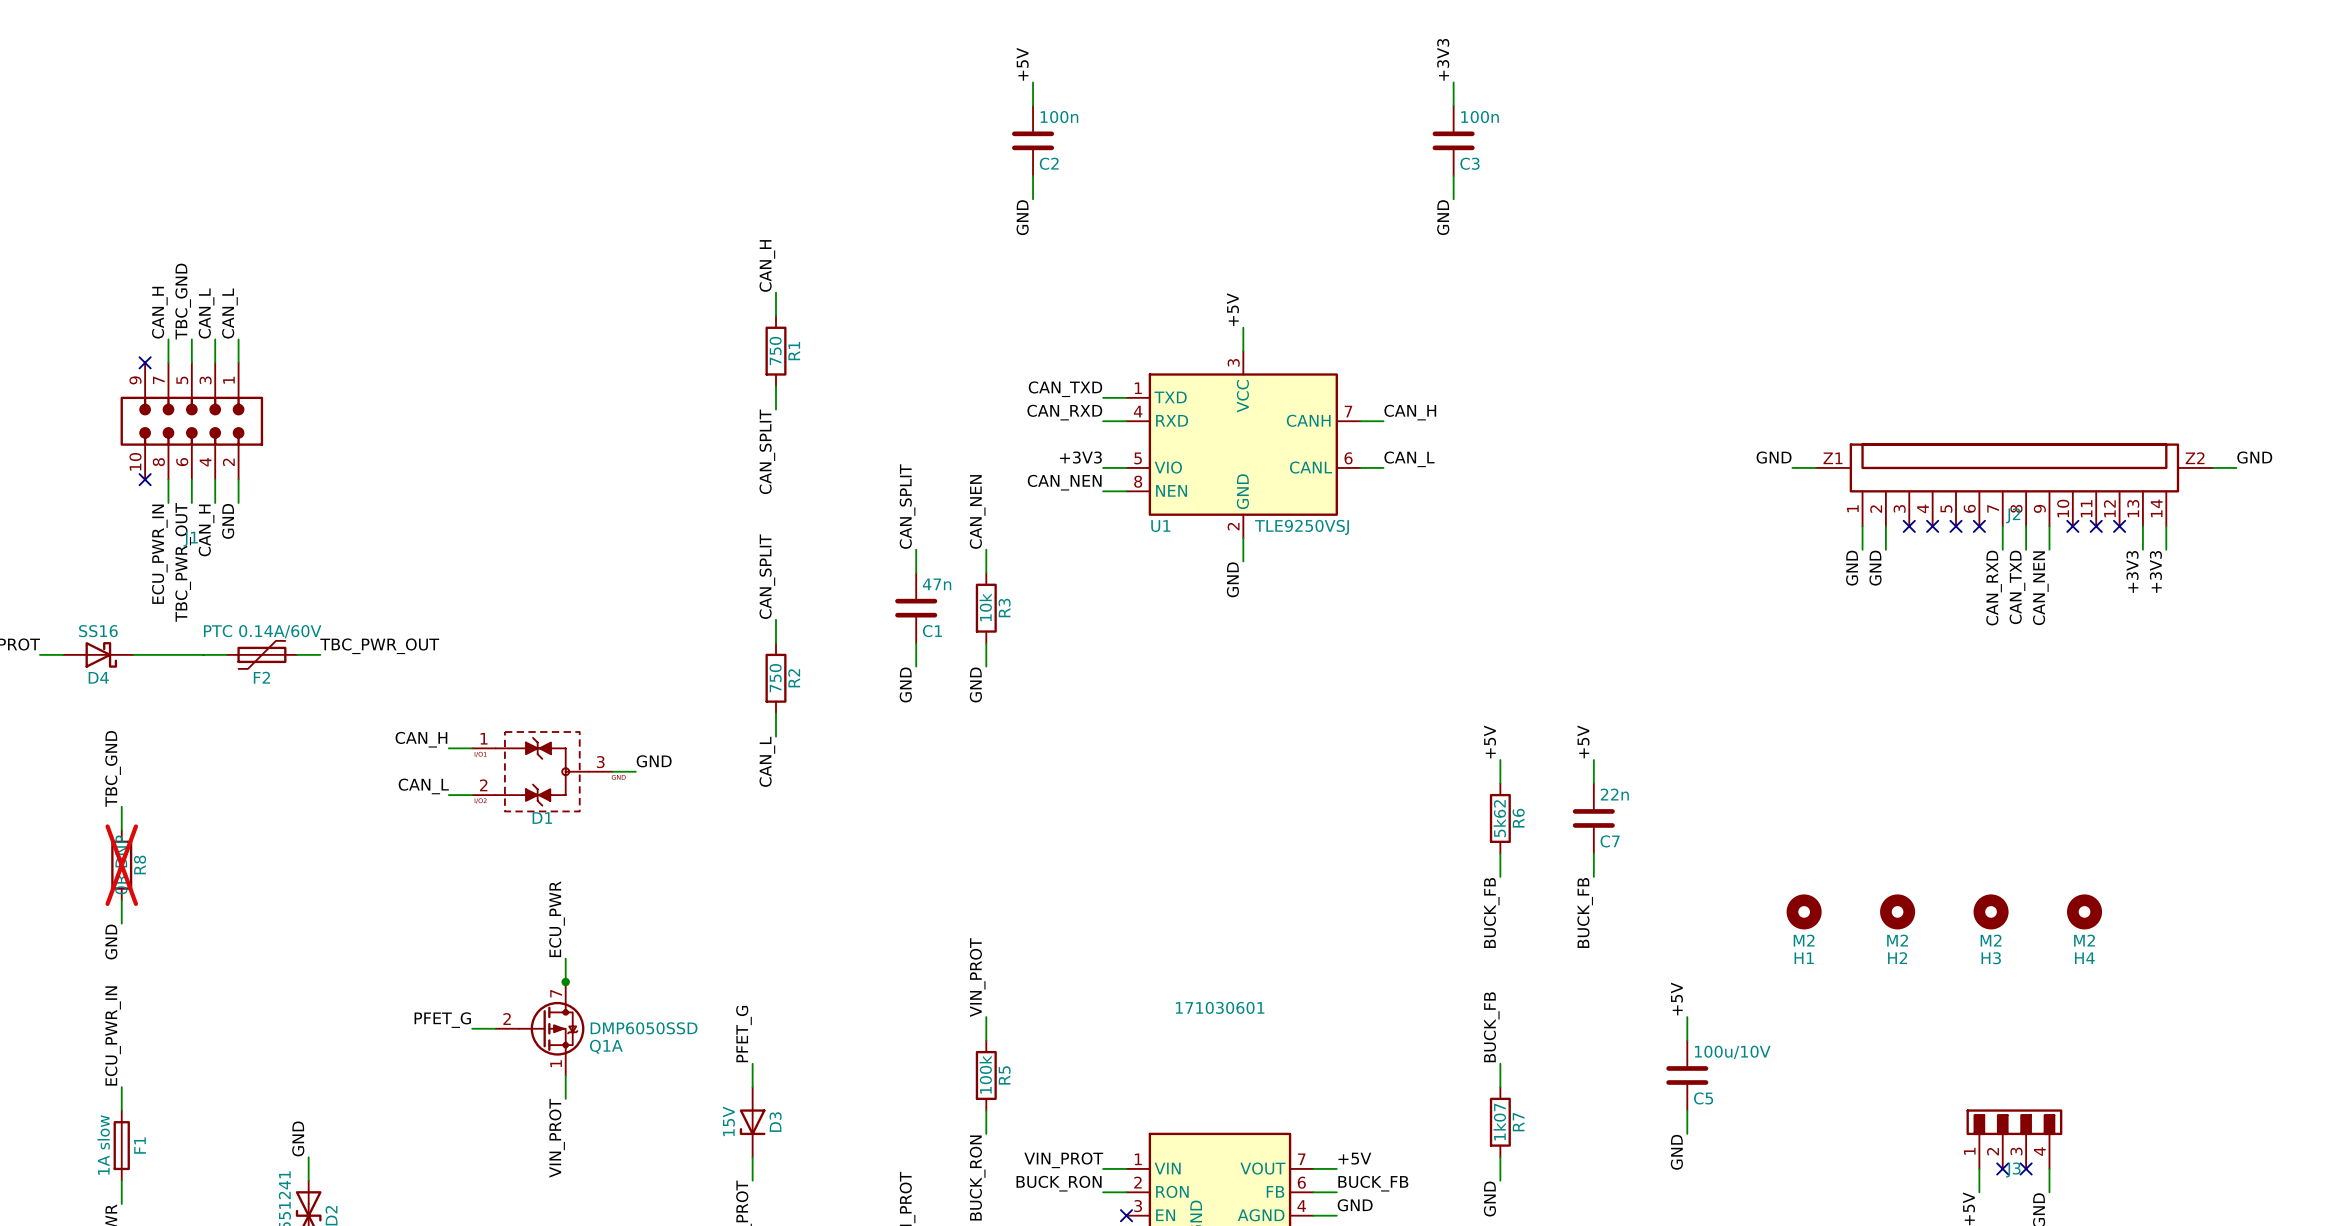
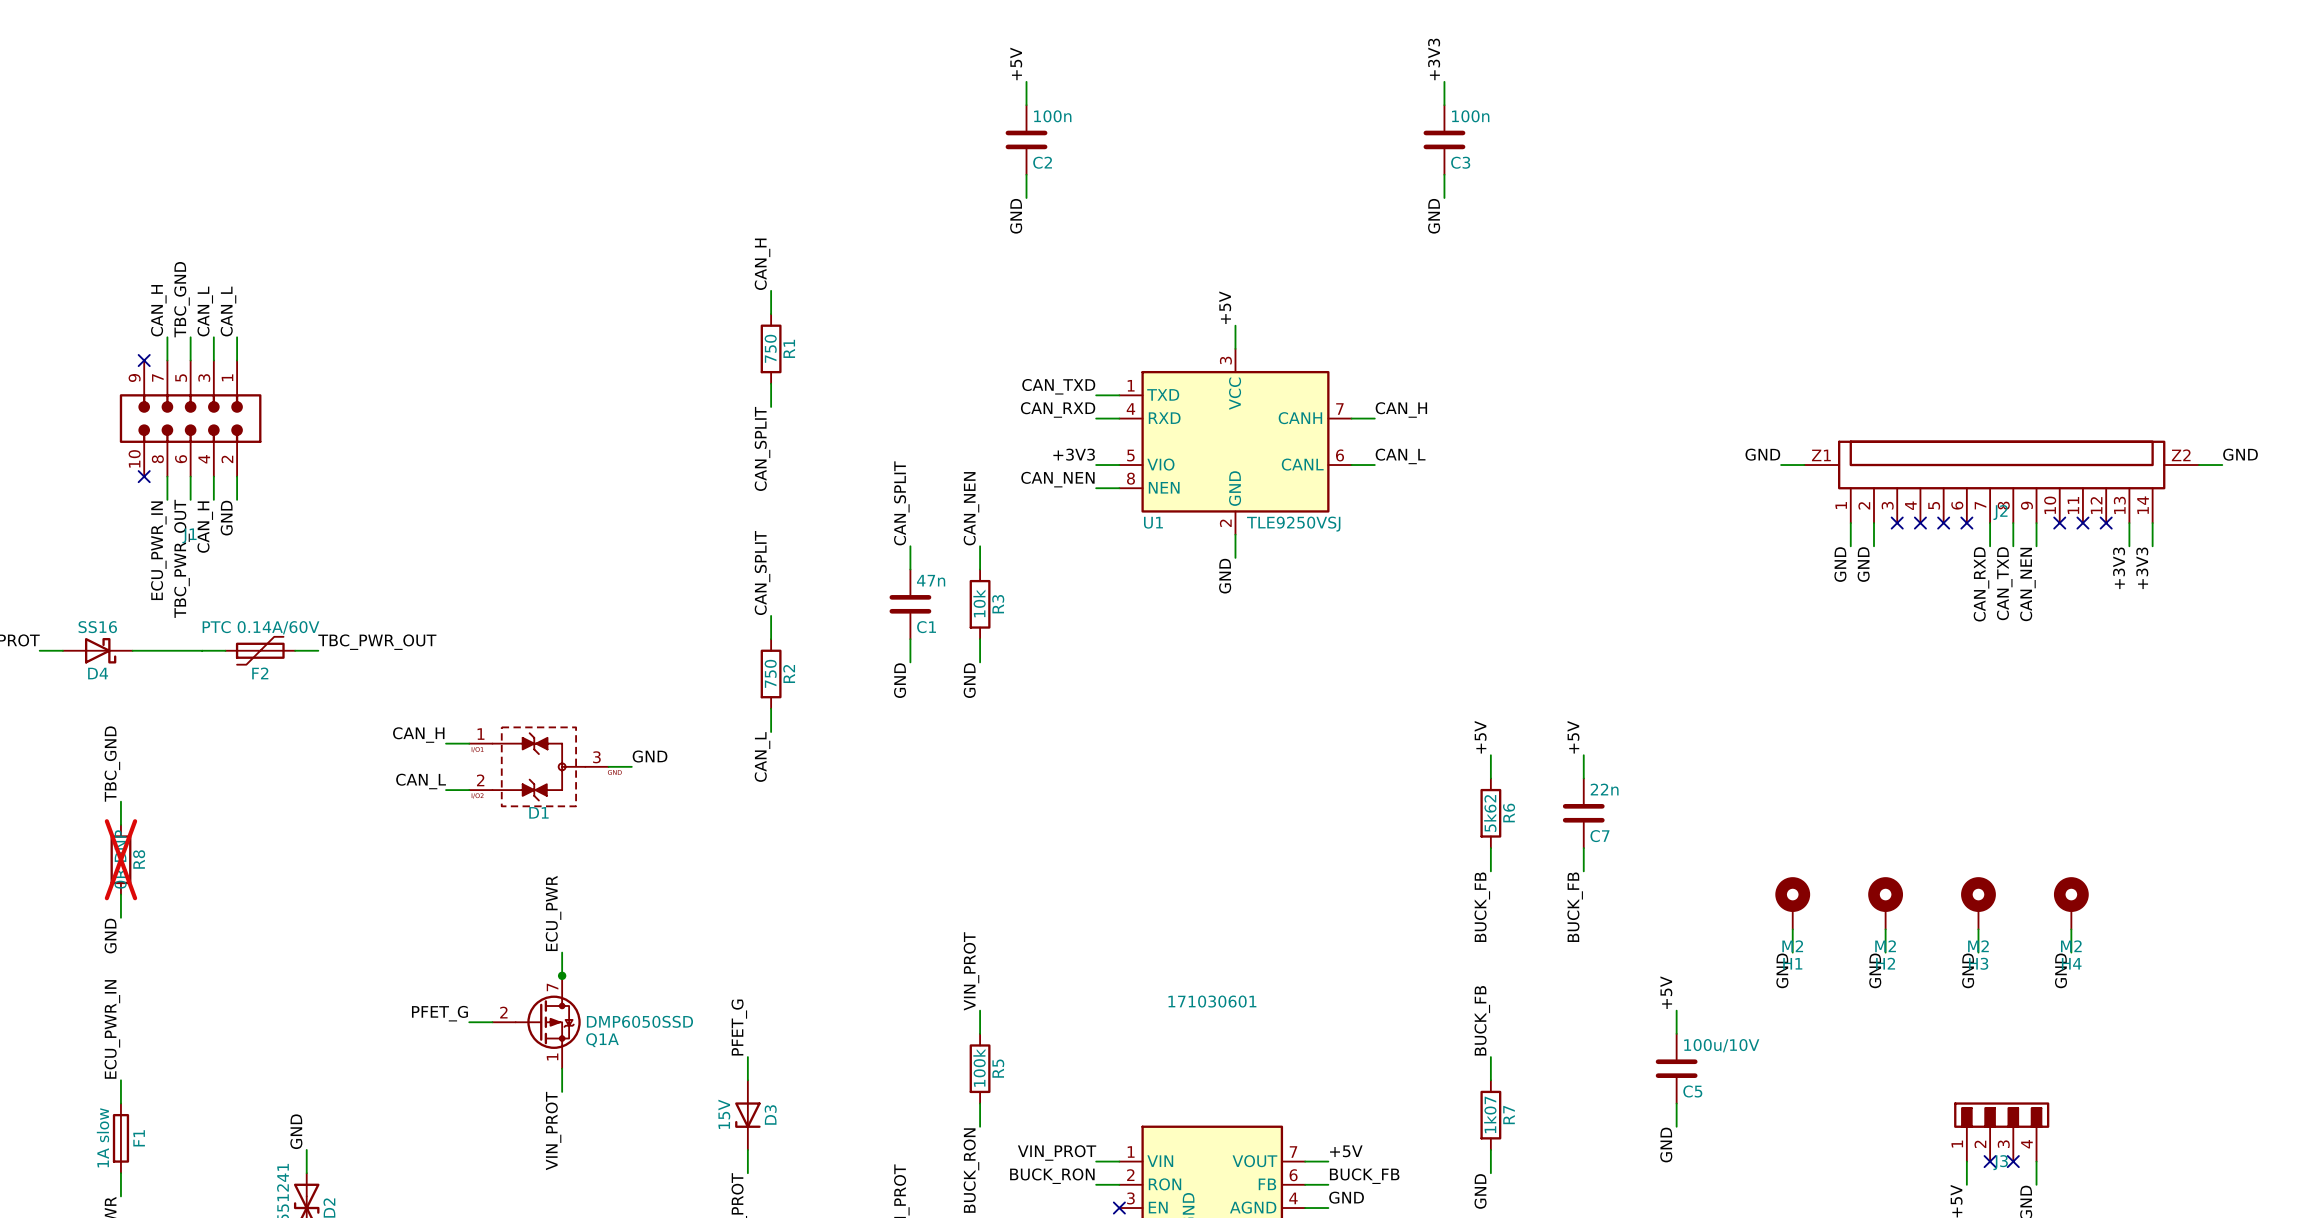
H1 symbol: [1786, 894, 1822, 930] -> [1775, 877, 1811, 930]
H2 symbol: [1880, 894, 1916, 930] -> [1868, 877, 1904, 930]
H3 symbol: [1973, 894, 2009, 930] -> [1961, 877, 1996, 930]
H4 symbol: [2067, 894, 2103, 930] -> [2053, 877, 2089, 930]
wire: none -> (1792, 929) (1792, 952)
wire: none -> (1885, 929) (1885, 952)
wire: none -> (1978, 929) (1978, 952)
wire: none -> (2071, 929) (2071, 952)
label: none -> GND (1782, 970)
label: none -> GND (1875, 970)
label: none -> GND (1968, 970)
label: none -> GND (2061, 970)

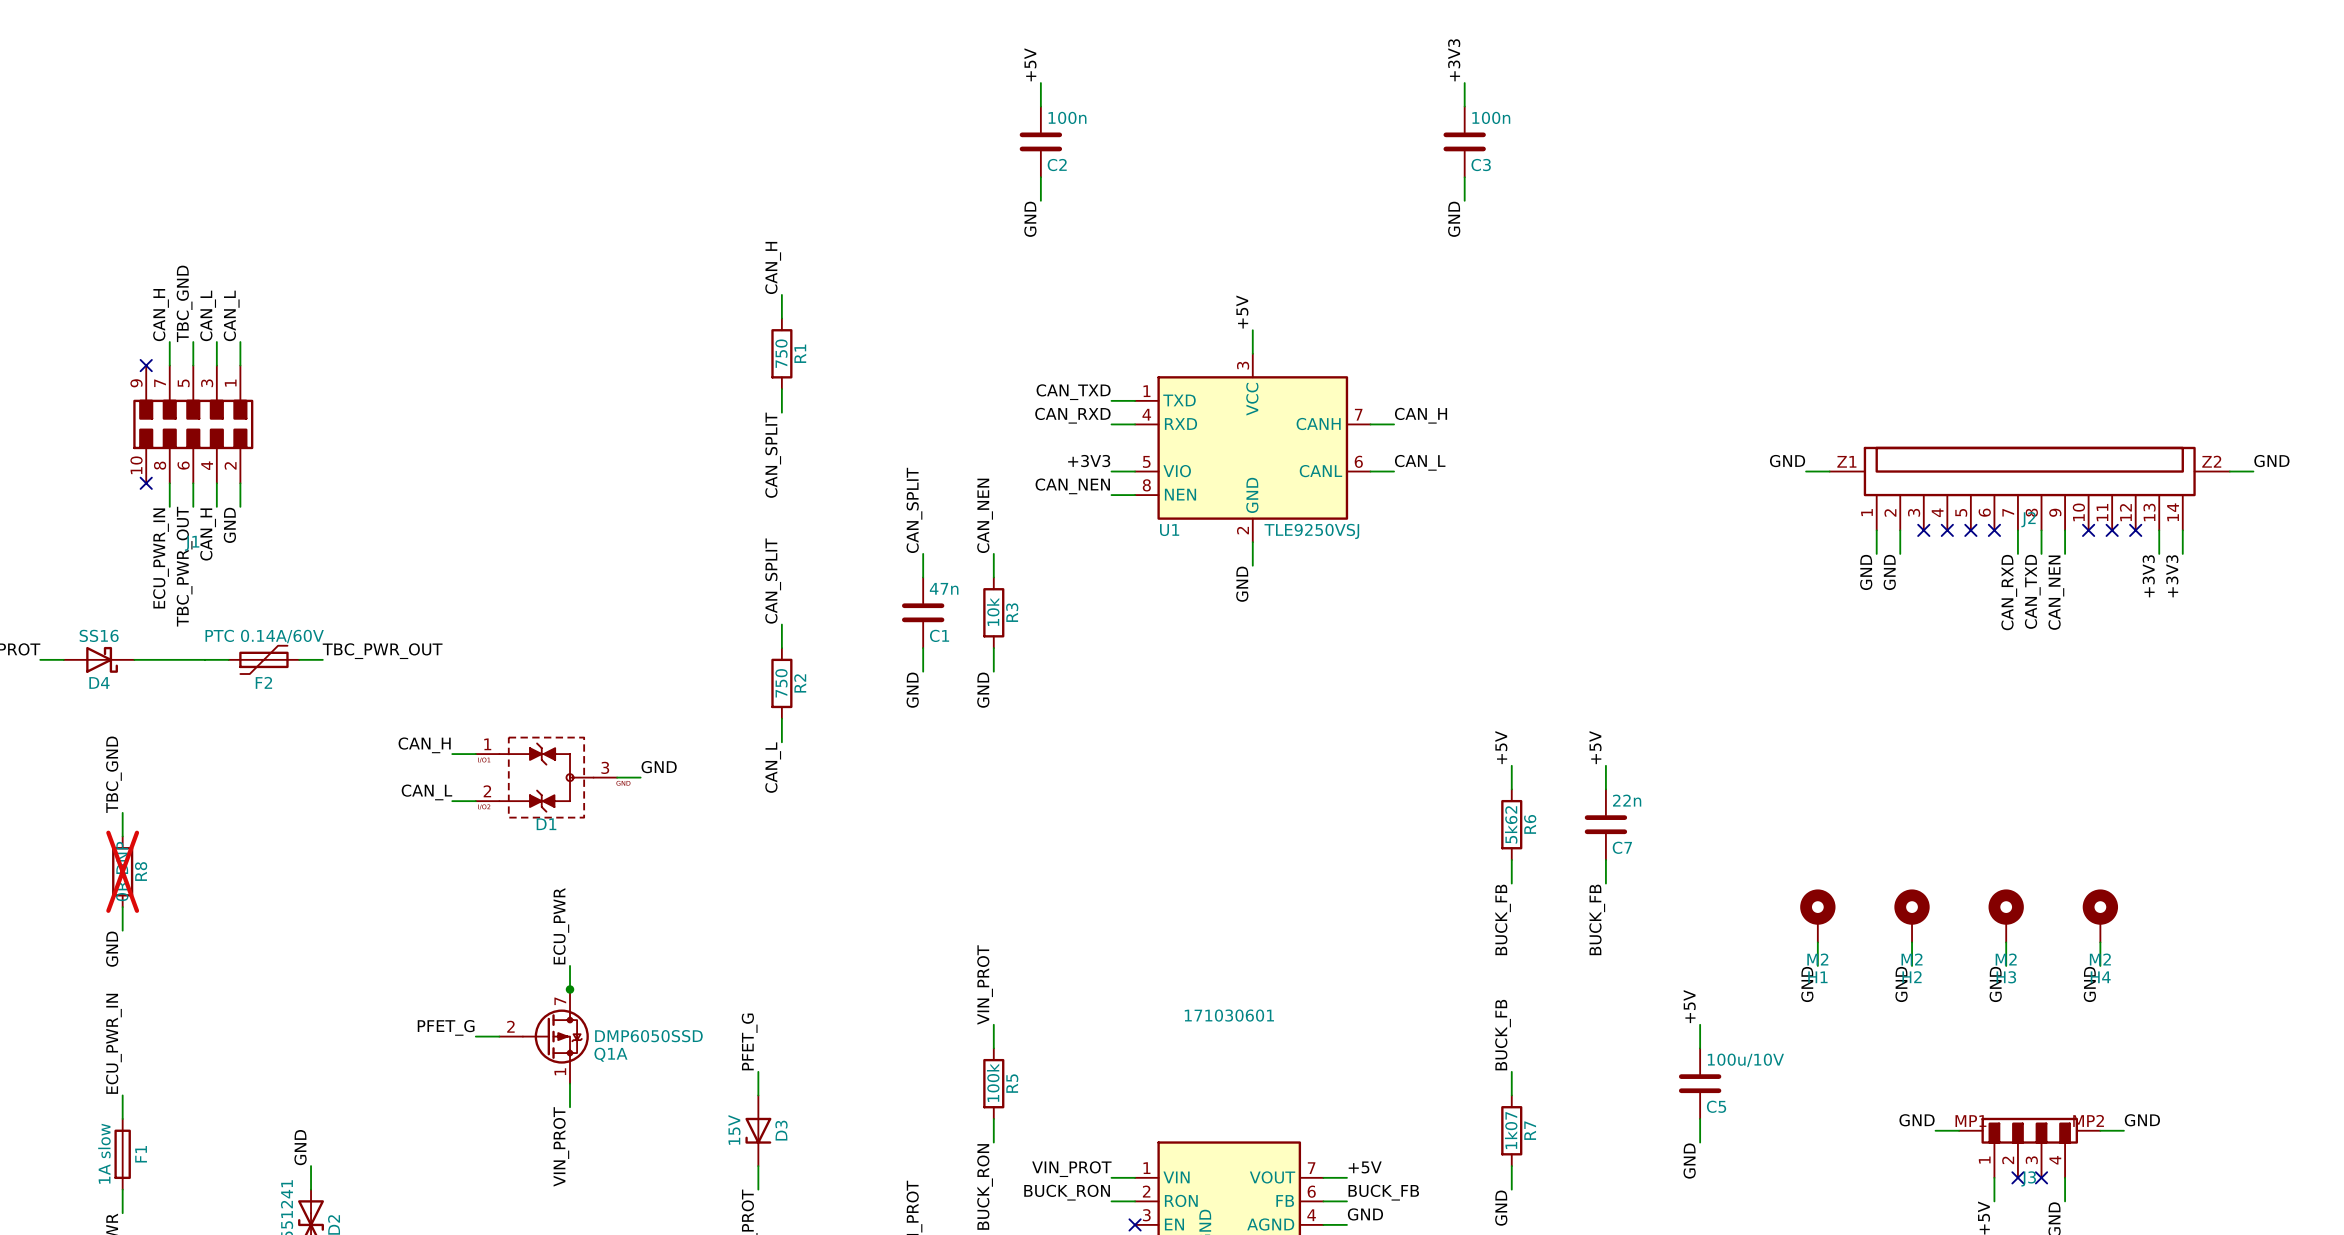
J1 symbol: [119, 360, 262, 477] -> [133, 365, 254, 484]
J3 symbol: [1954, 1102, 2050, 1162] -> [1959, 1117, 2101, 1178]
label: none -> GND (1917, 1120)
label: none -> GND (2142, 1120)
wire: none -> (1935, 1130) (1959, 1130)
wire: none -> (2100, 1130) (2123, 1130)

